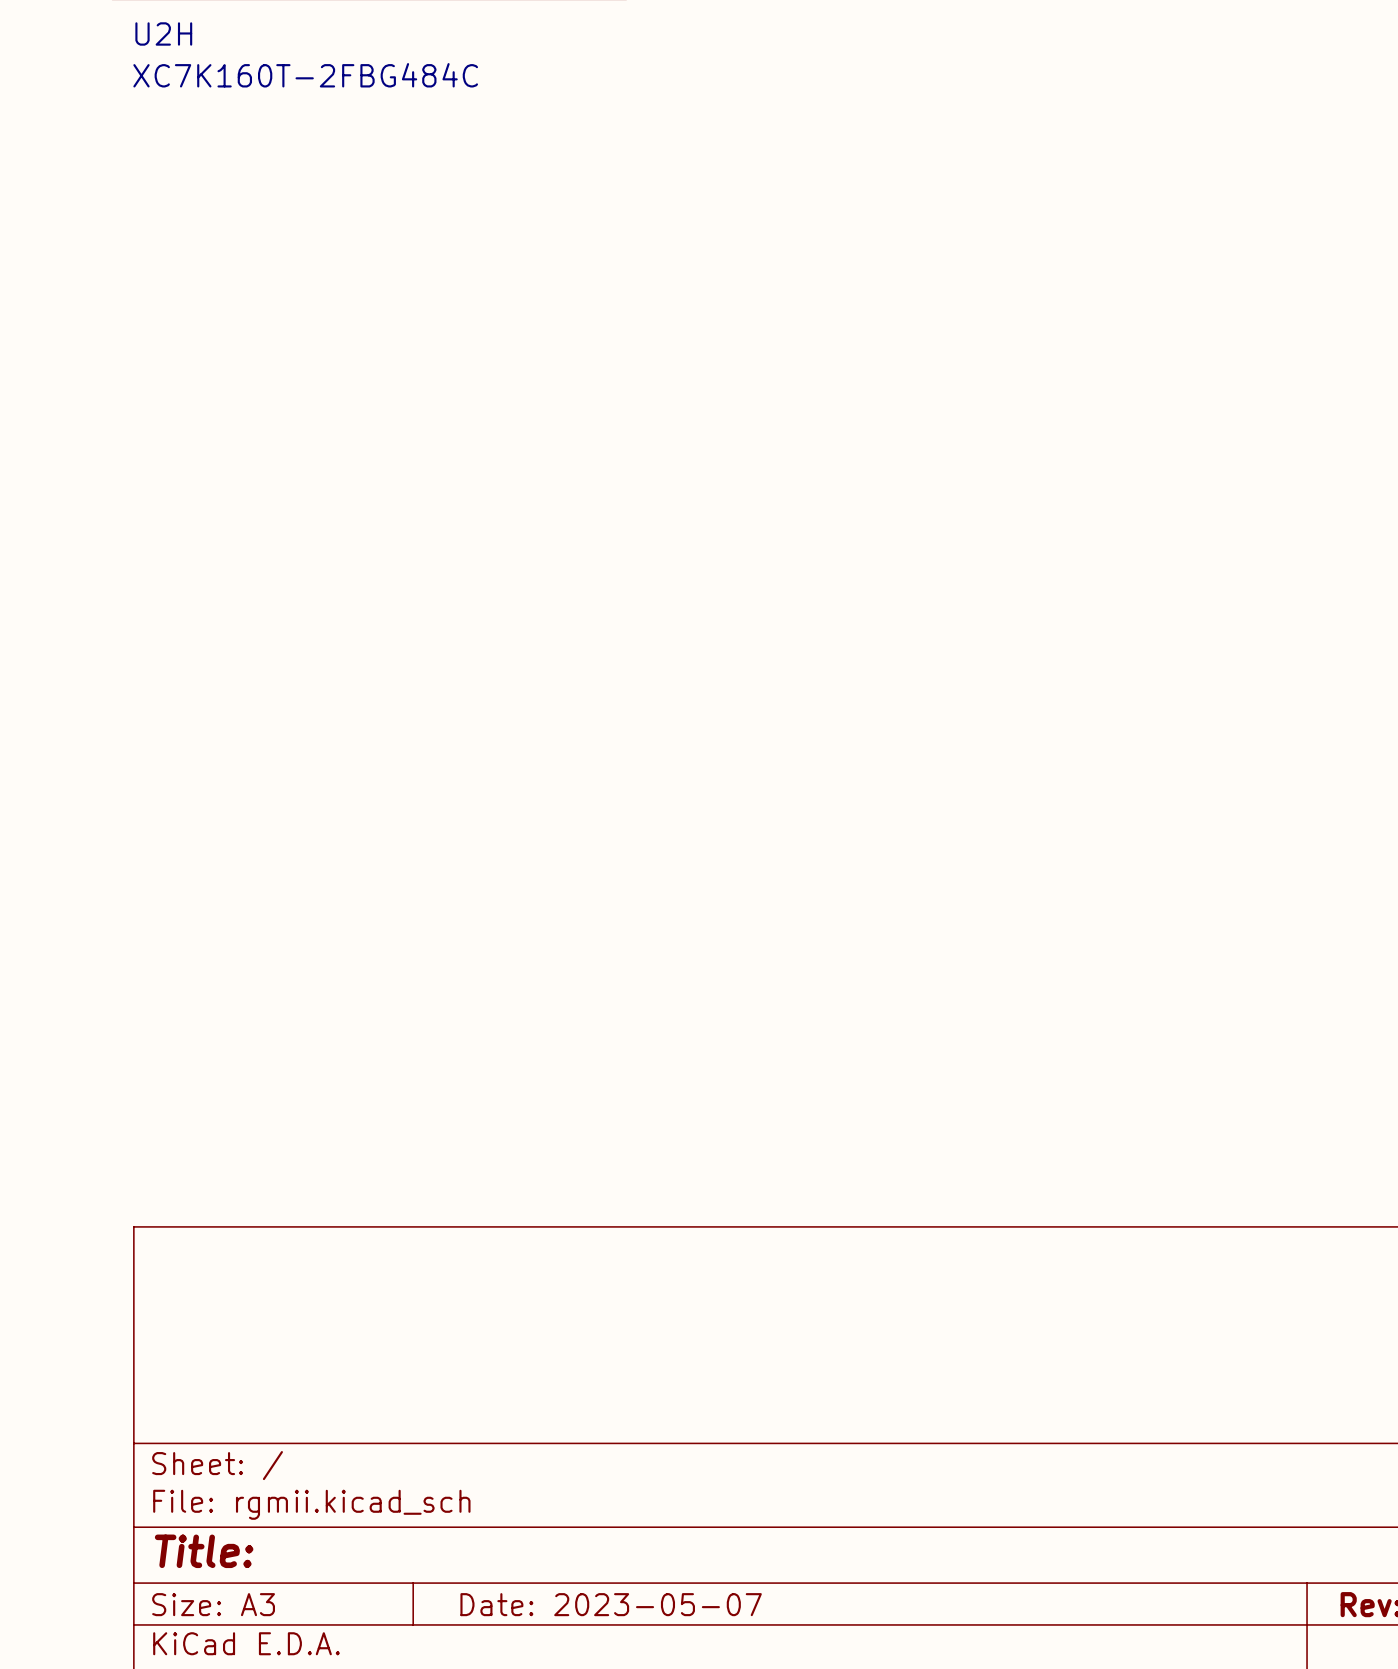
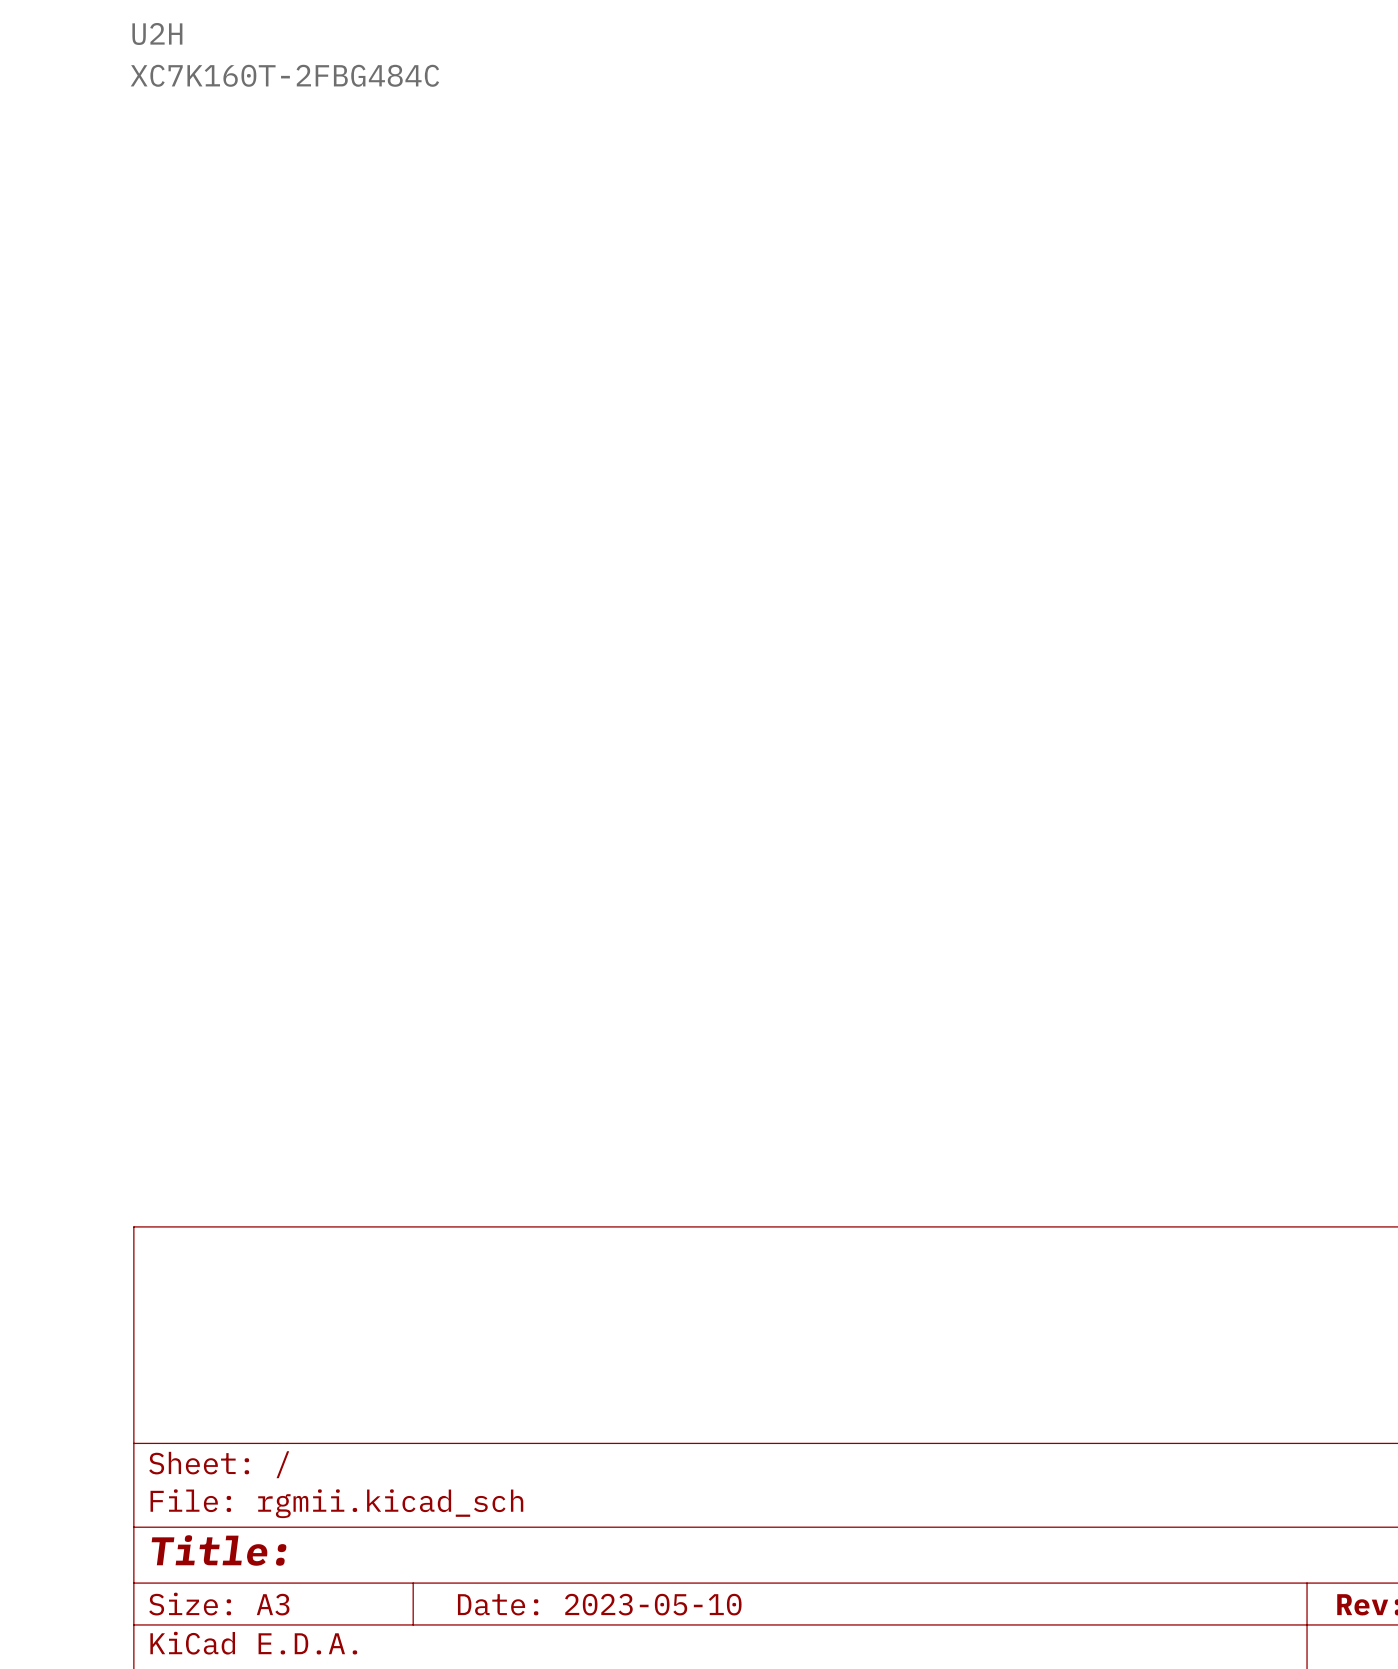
title block: Date: 2023-05-07 (611, 1604) -> Date: 2023-05-10 (599, 1604)

